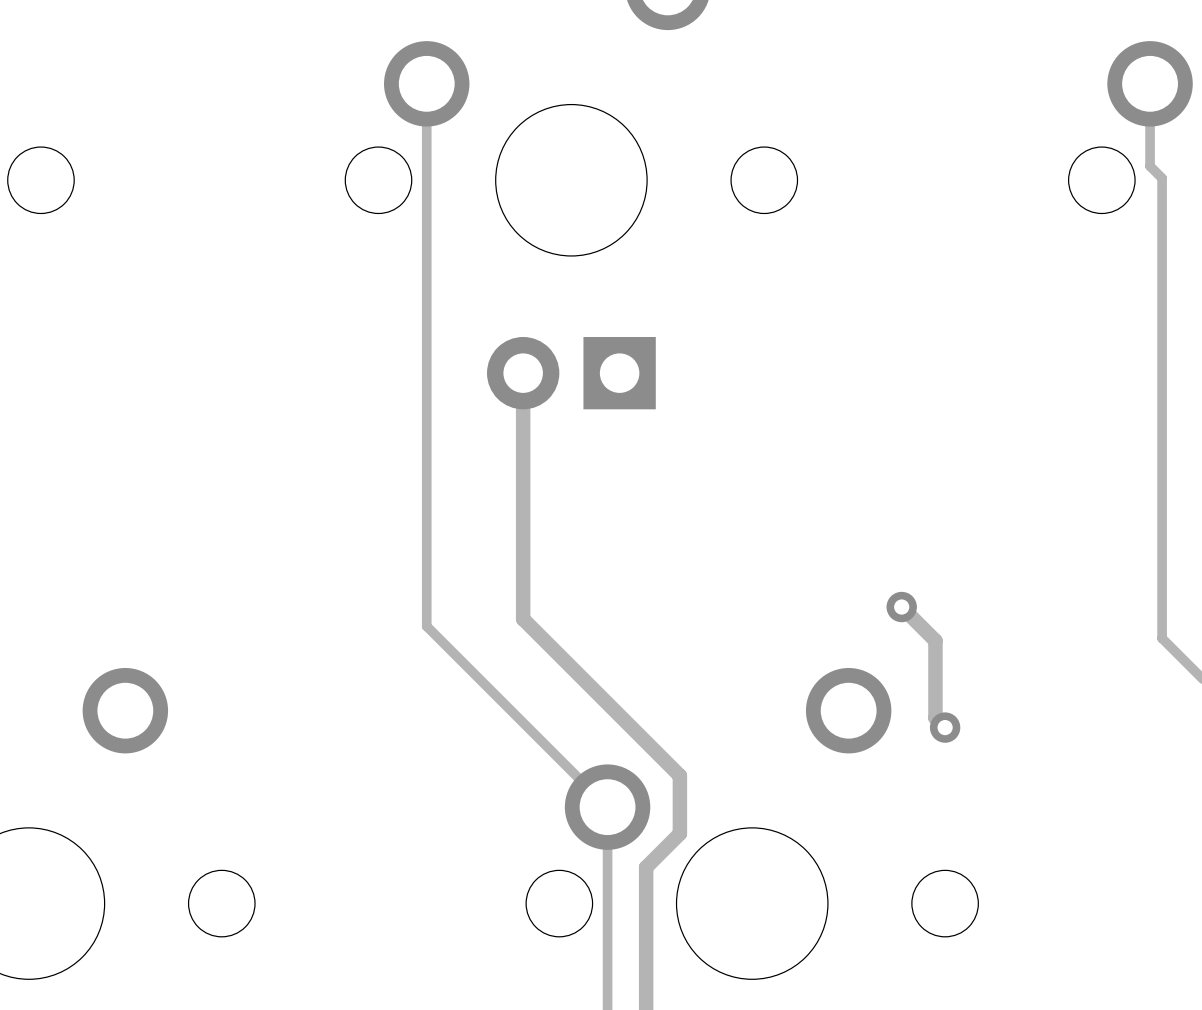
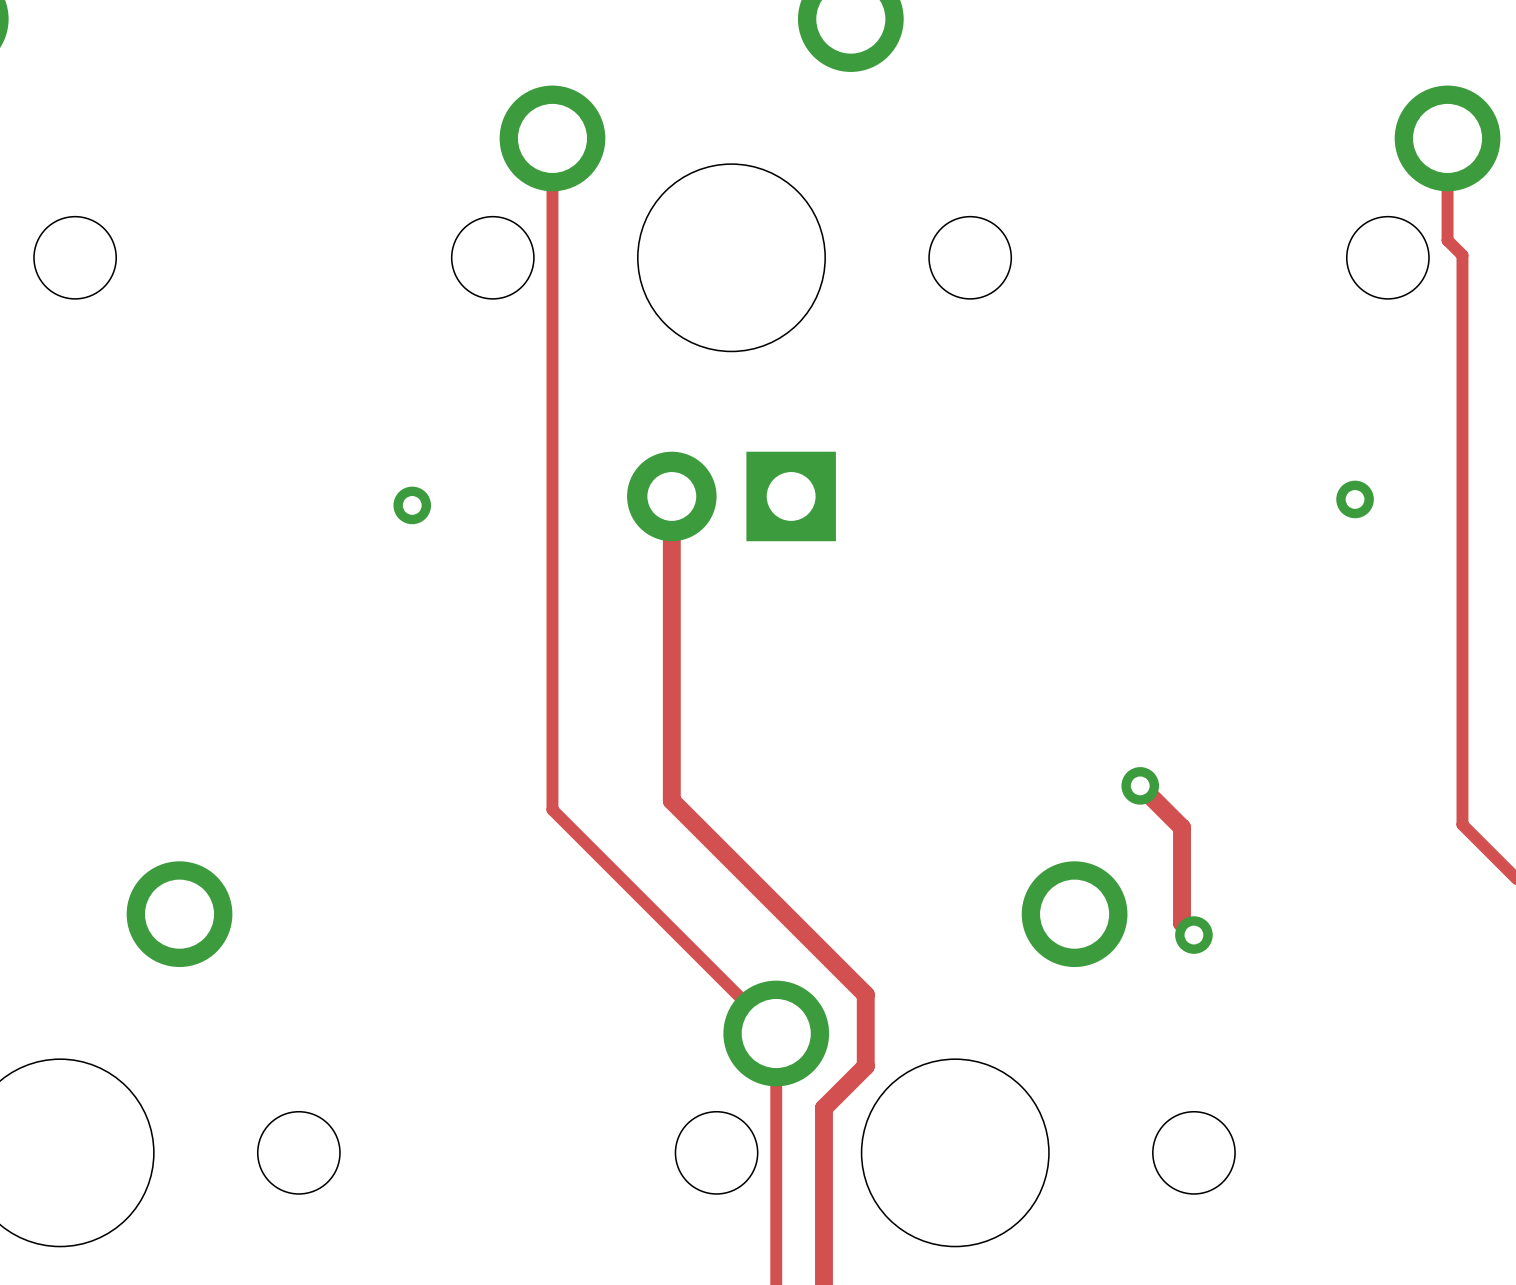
via: none -> (1355, 499)
via: none -> (412, 505)

